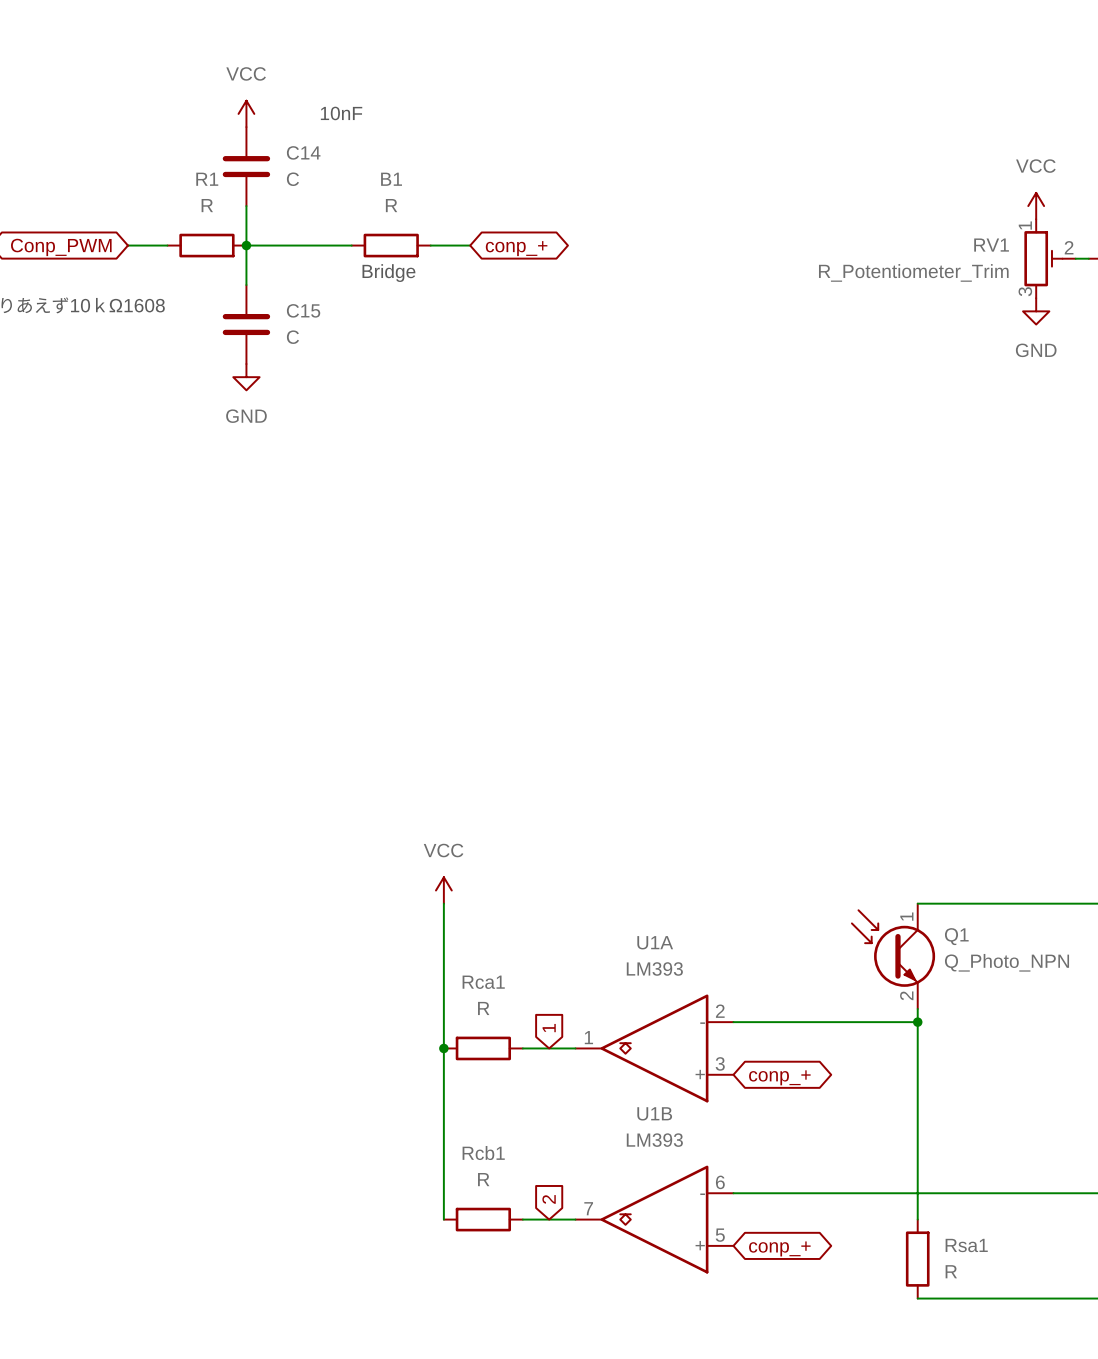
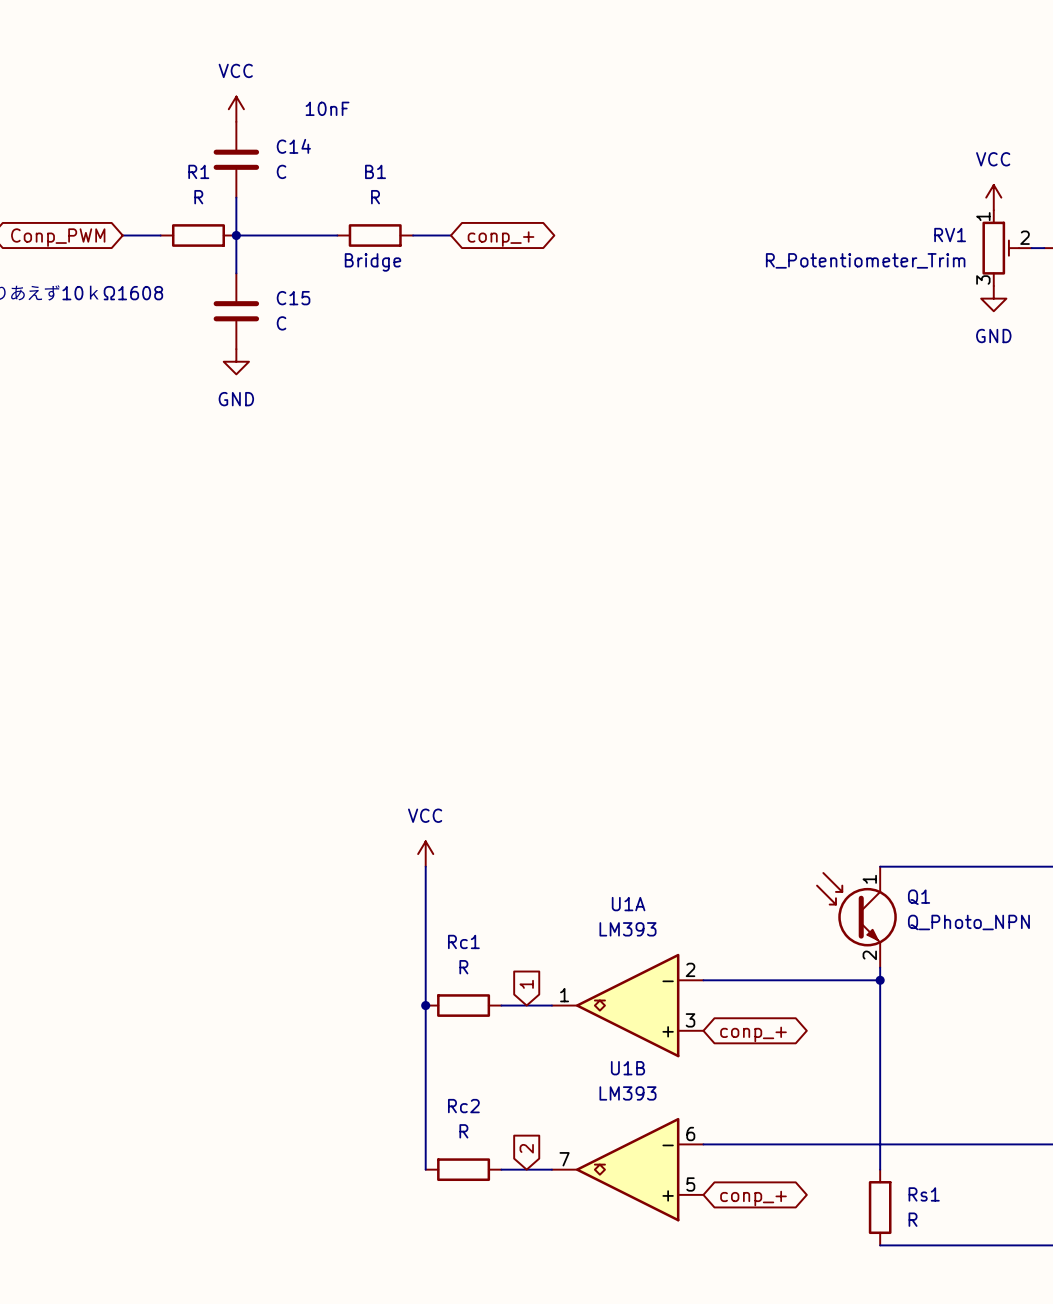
Rca1 name: Rca1 (483, 982) -> Rc1 (463, 941)
Rcb1 name: Rcb1 (483, 1153) -> Rc2 (463, 1106)
Rsa1 name: Rsa1 (966, 1245) -> Rs1 (924, 1194)

